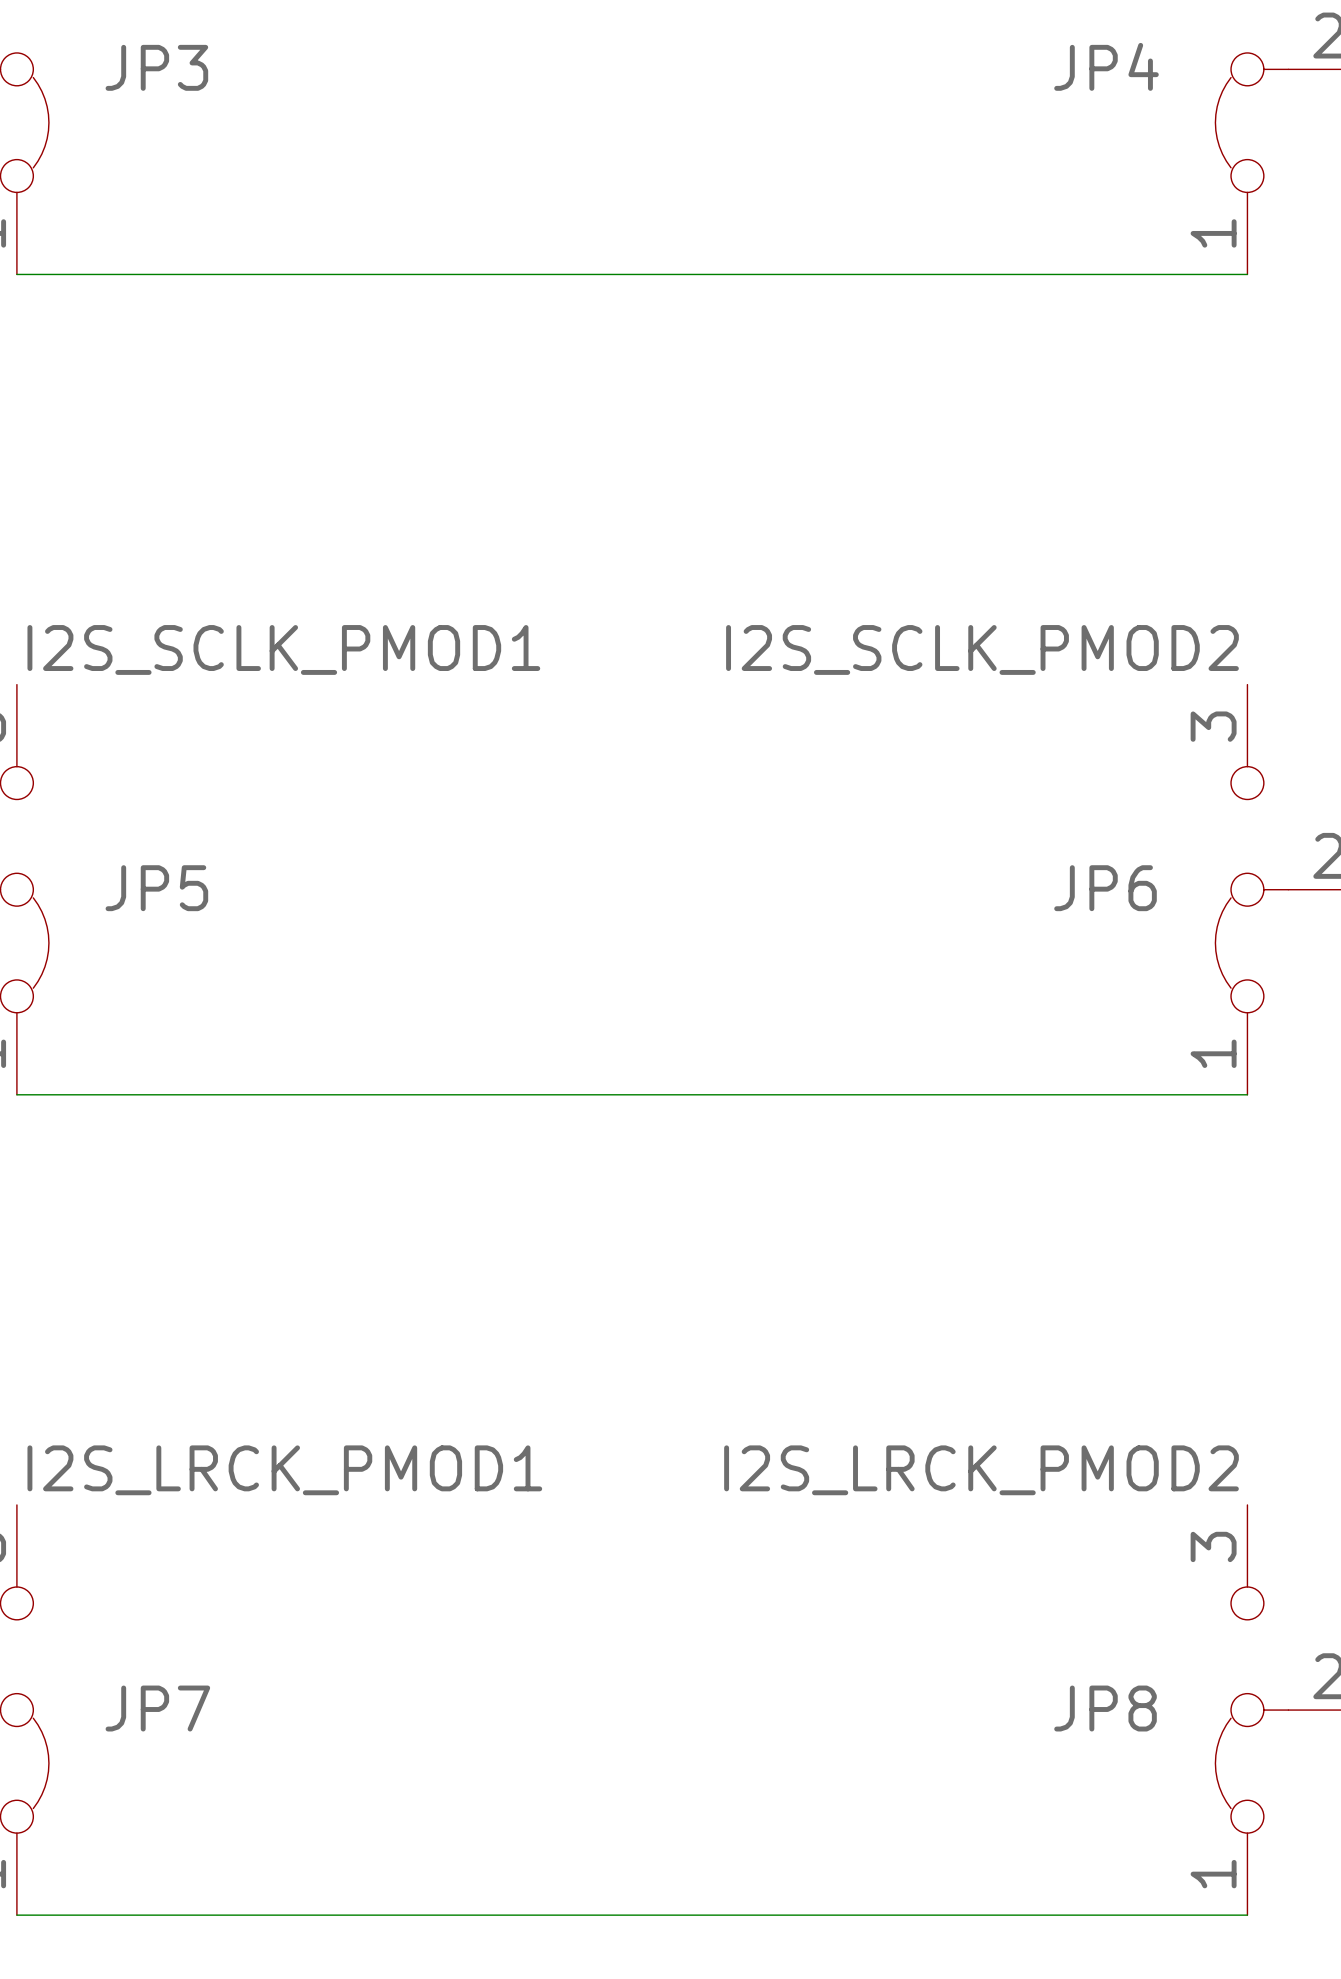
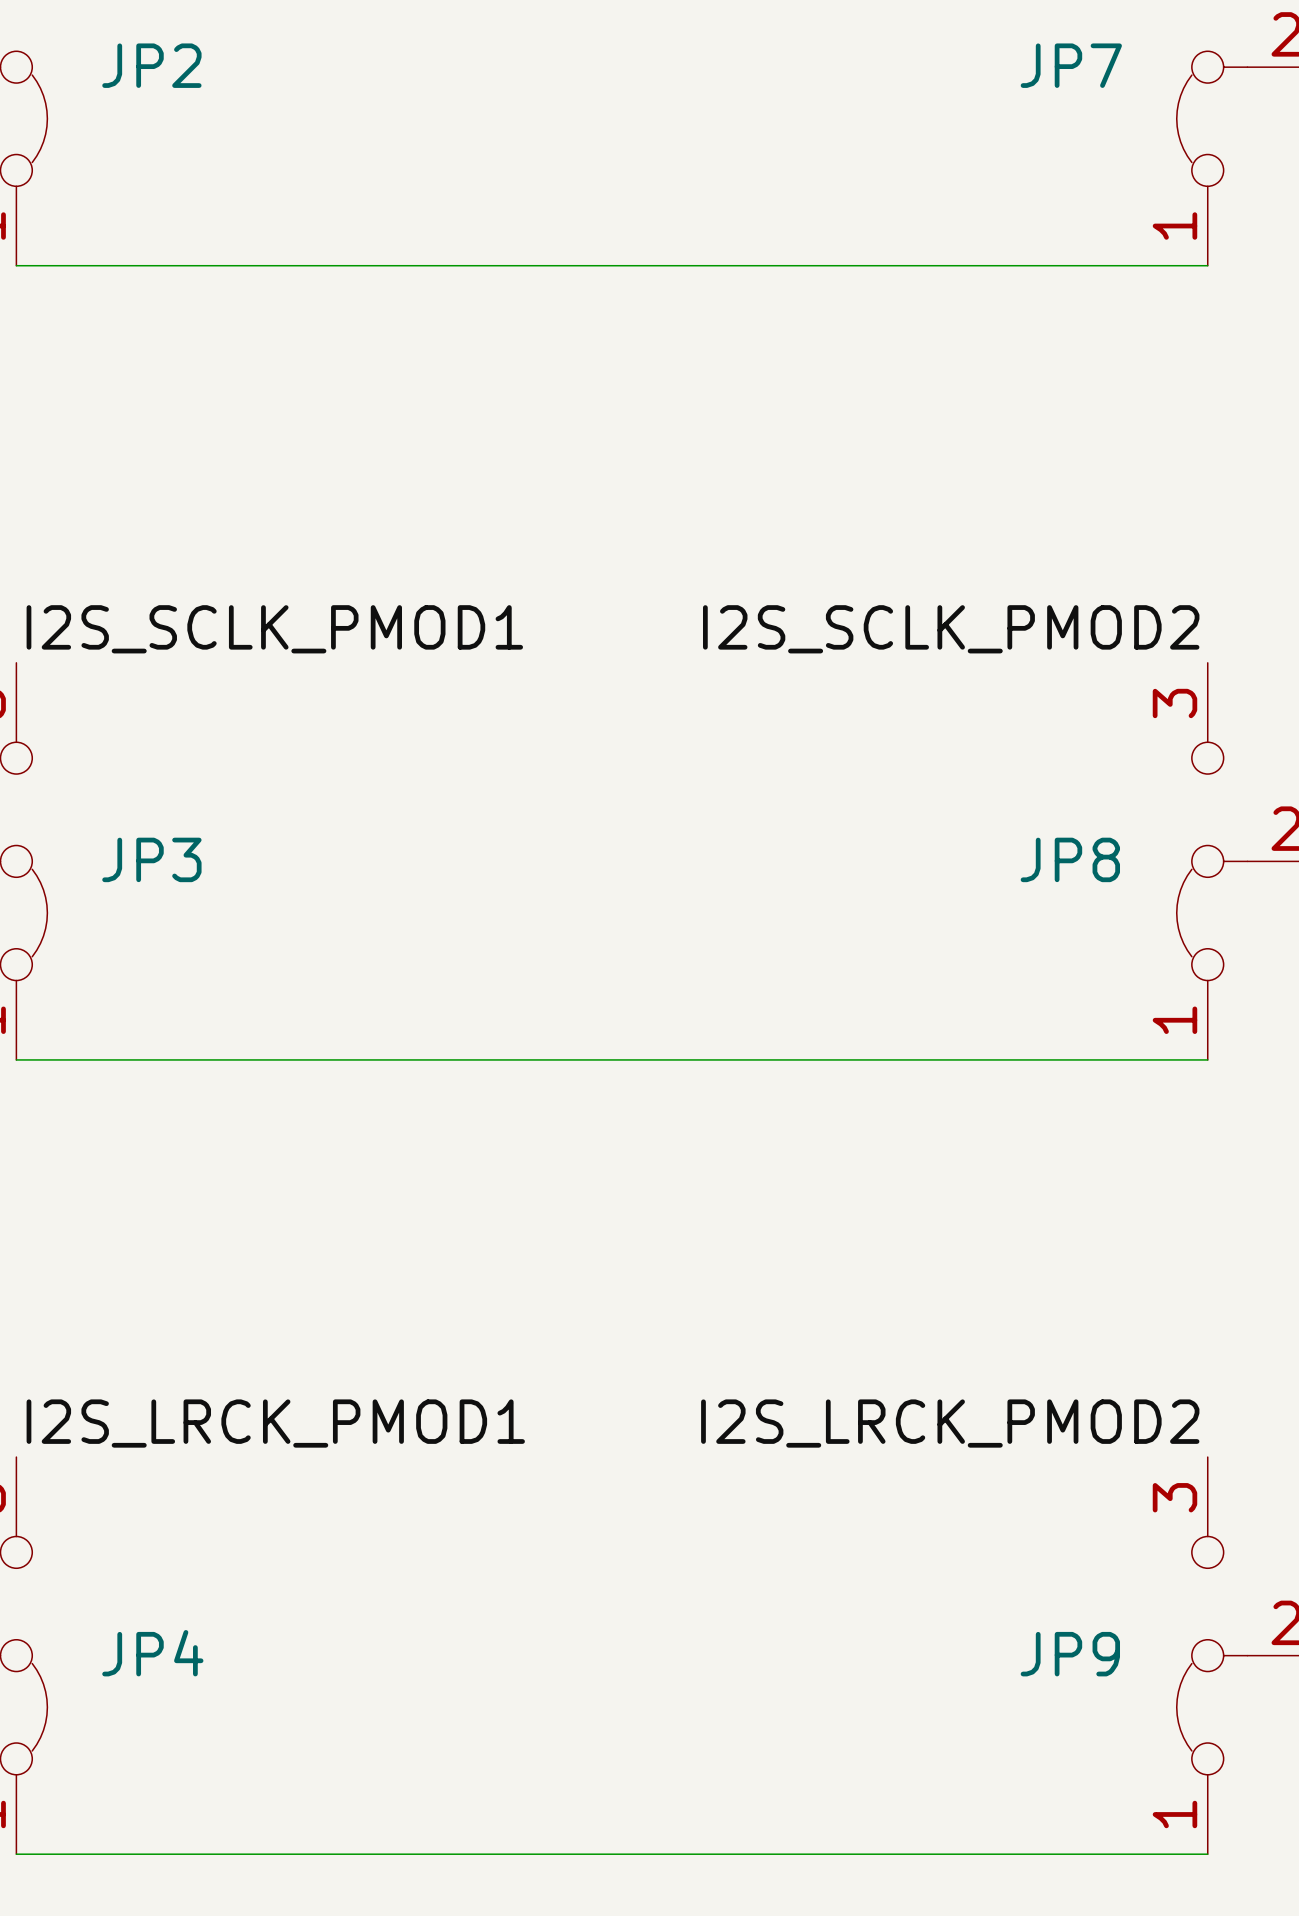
JP4 name: JP4 (1106, 66) -> JP7 (1071, 65)
JP3 name: JP3 (156, 67) -> JP2 (151, 65)
JP5 name: JP5 (156, 888) -> JP3 (151, 859)
JP6 name: JP6 (1105, 888) -> JP8 (1070, 859)
JP7 name: JP7 (157, 1708) -> JP4 (152, 1653)
JP8 name: JP8 (1105, 1708) -> JP9 (1070, 1654)

